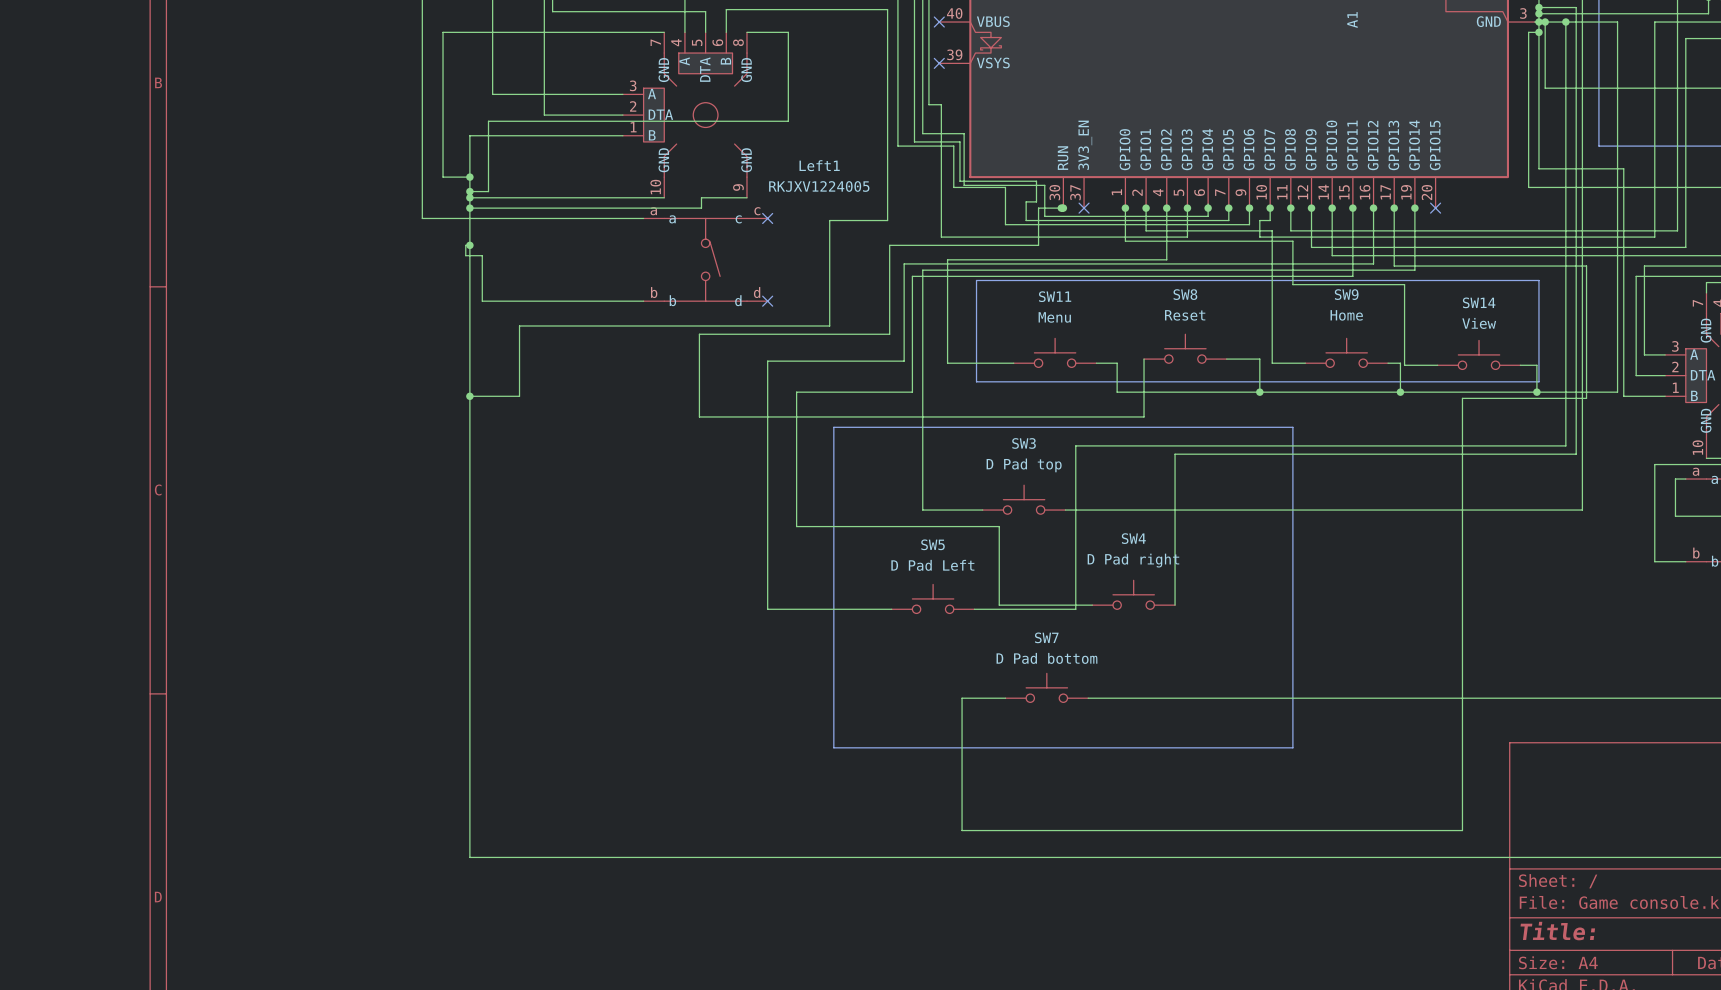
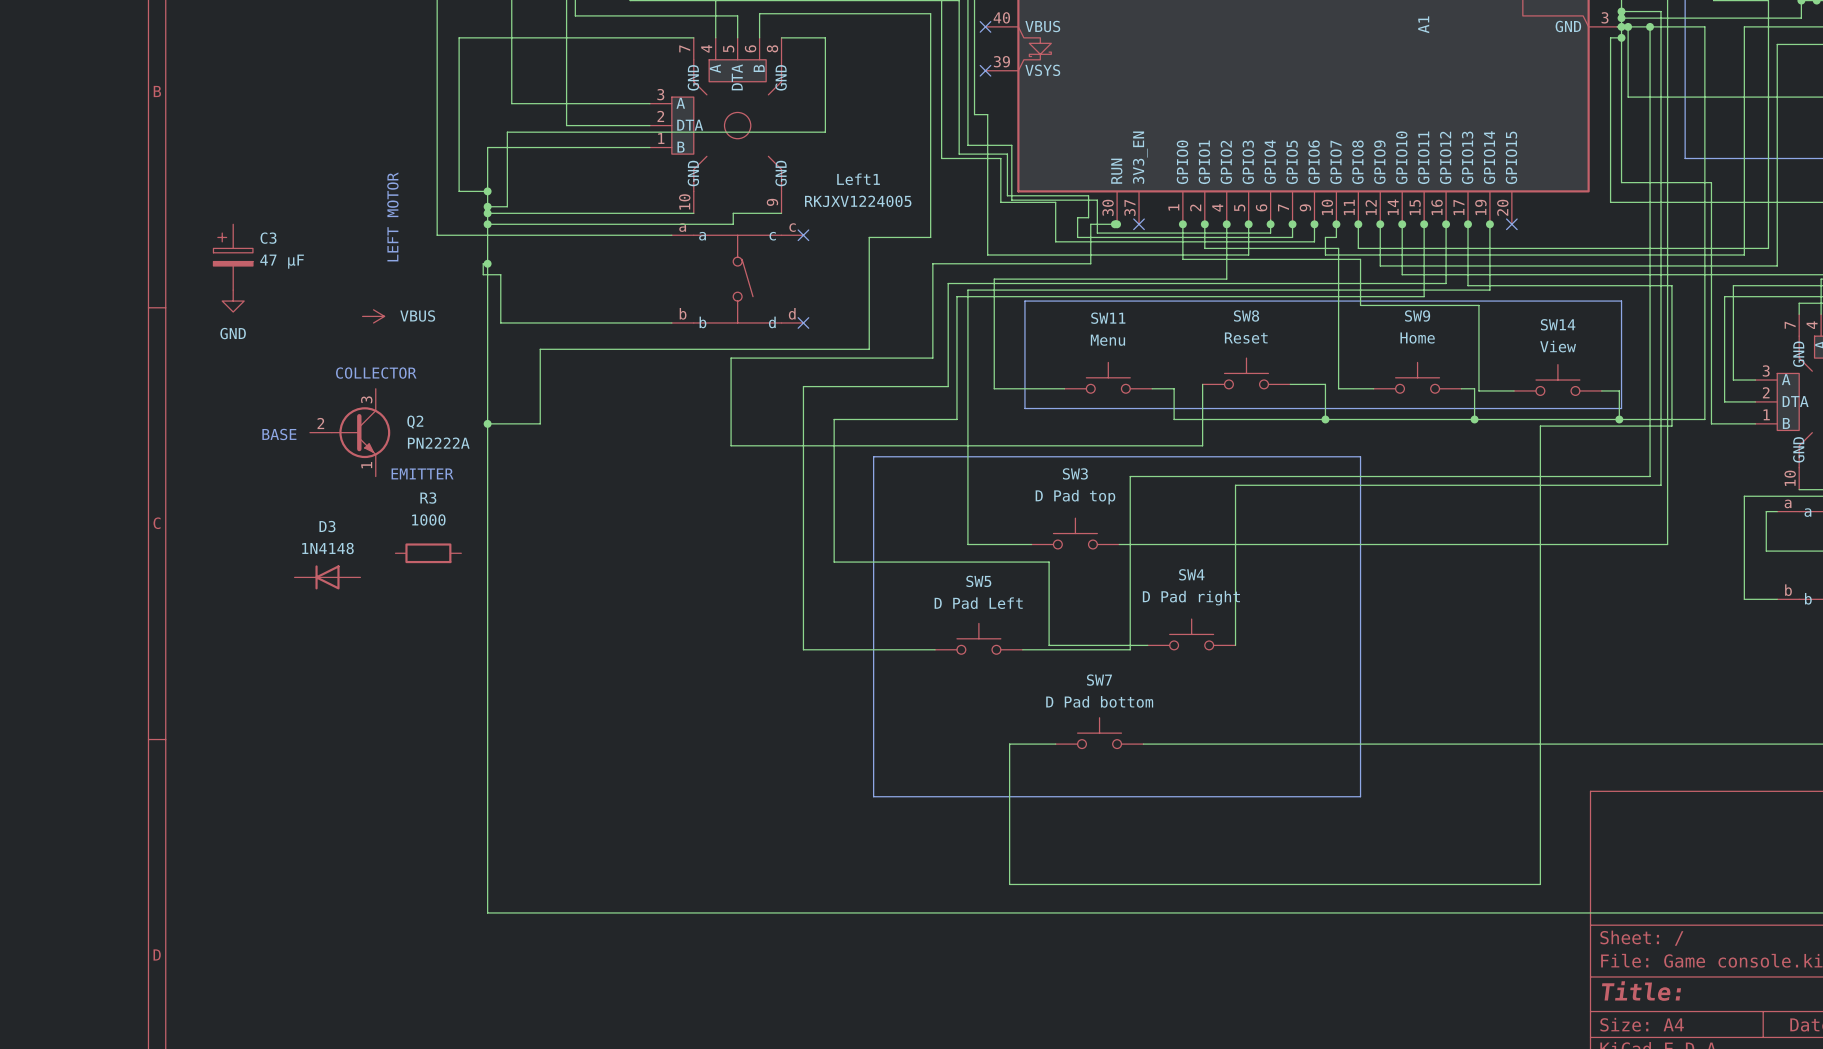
text: none -> LEFT MOTOR (392, 216)
C3: none -> 47 µF (233, 257)
power symbol: none -> GND (233, 301)
power symbol: none -> VBUS (373, 316)
text: none -> COLLECTOR (376, 373)
Q2: none -> PN2222A (350, 432)
text: none -> BASE (279, 434)
text: none -> EMITTER (422, 473)
R3: none -> 1000 (428, 553)
D3: none -> 1N4148 (327, 577)

